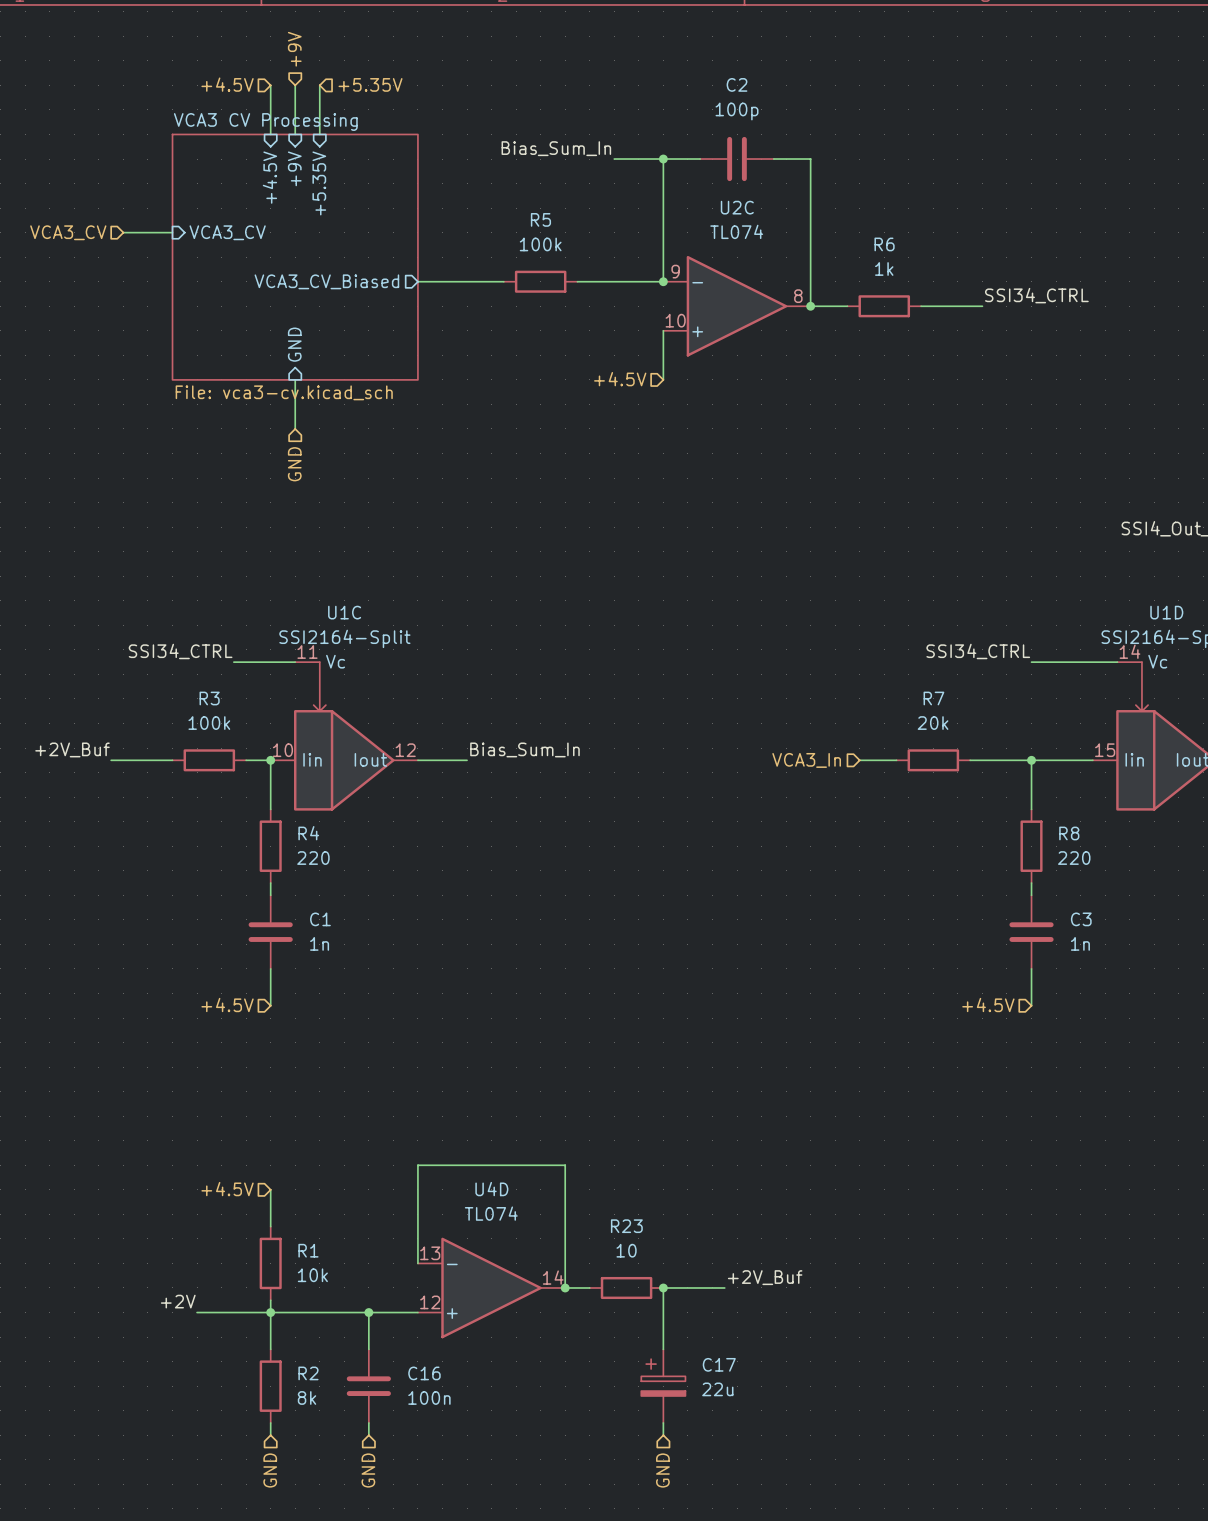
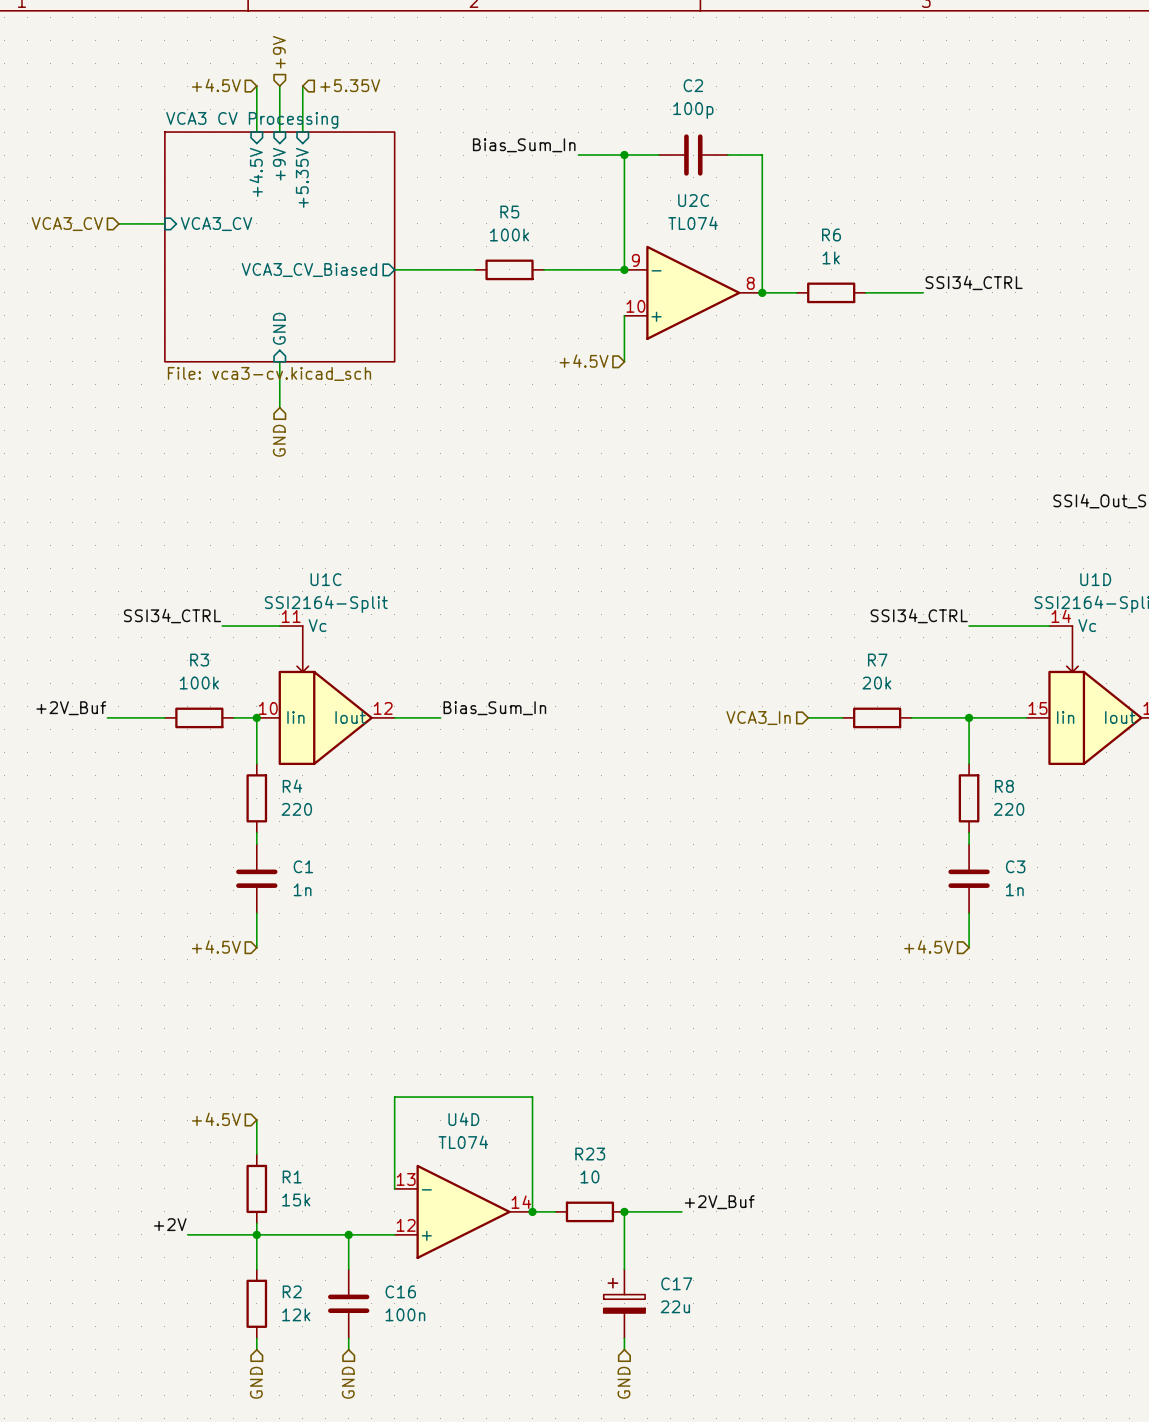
R1 value: 10k (312, 1275) -> 15k (296, 1199)
R2 value: 8k (307, 1397) -> 12k (296, 1314)

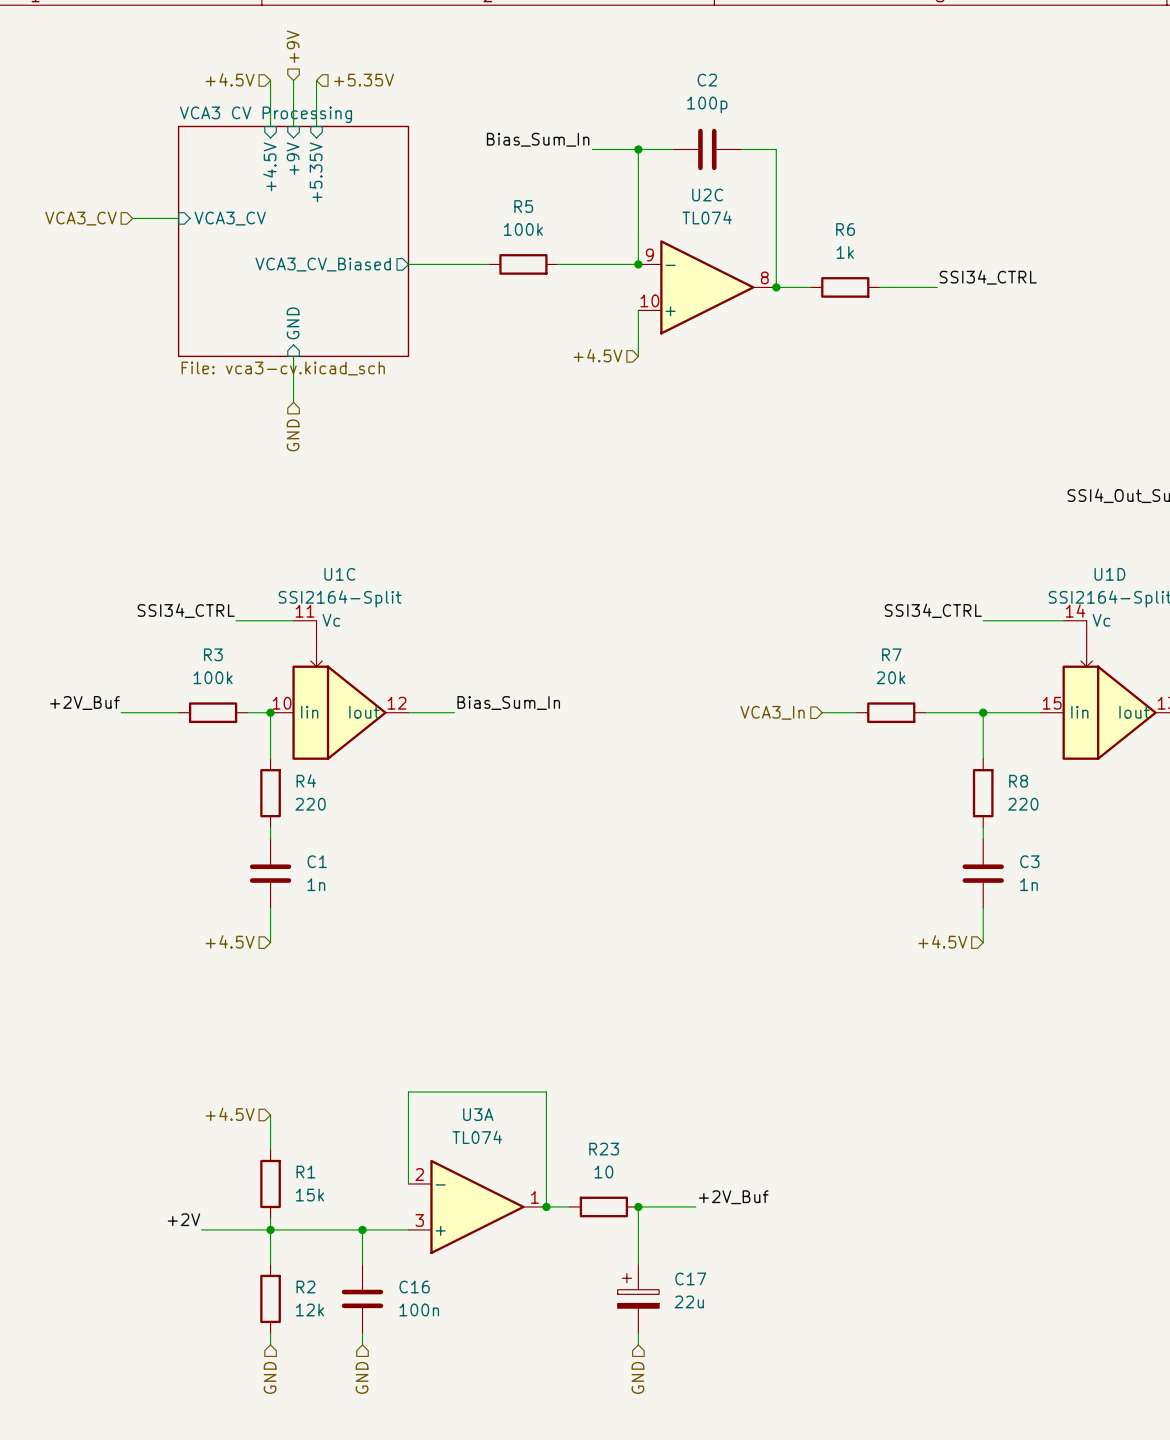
U4D name: U4D (463, 1119) -> U3A (478, 1114)
U4D pin number: 13 (406, 1179) -> 2 (419, 1174)
U4D pin number: 14 (521, 1202) -> 1 (534, 1197)
U4D pin number: 12 (406, 1225) -> 3 (419, 1220)

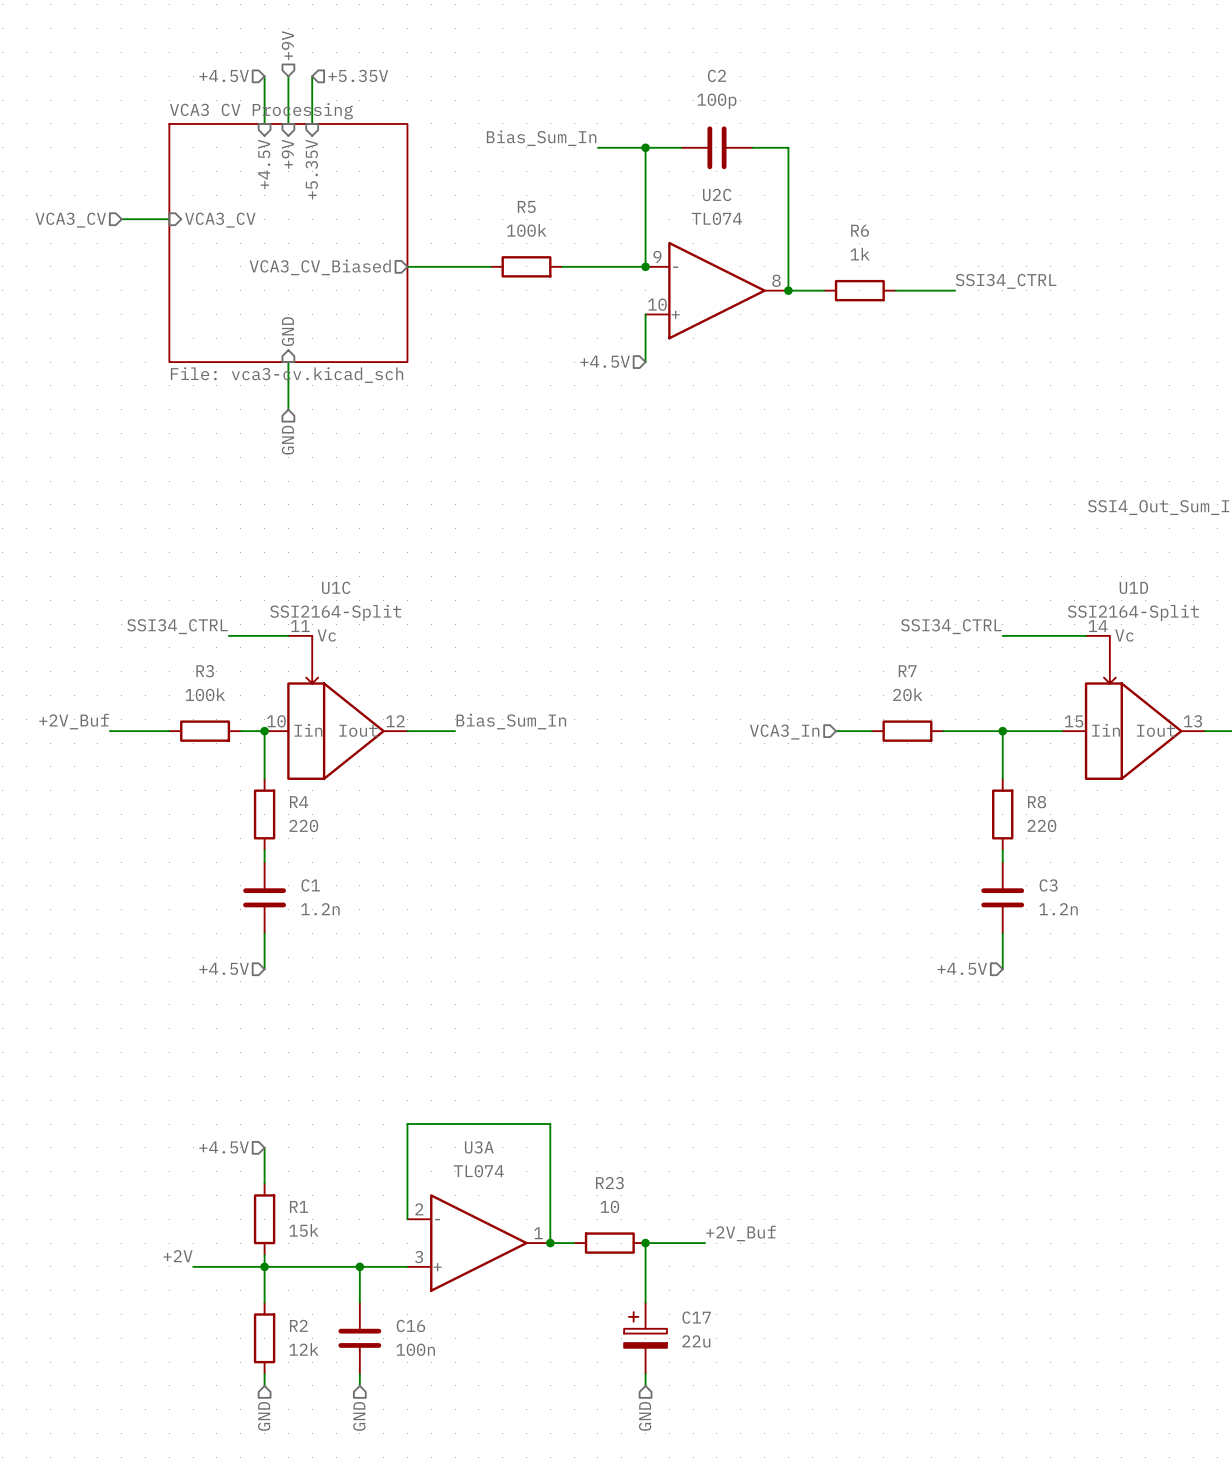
C1 value: 1n (316, 884) -> 1.2n (320, 909)
C3 value: 1n (1029, 884) -> 1.2n (1058, 909)

